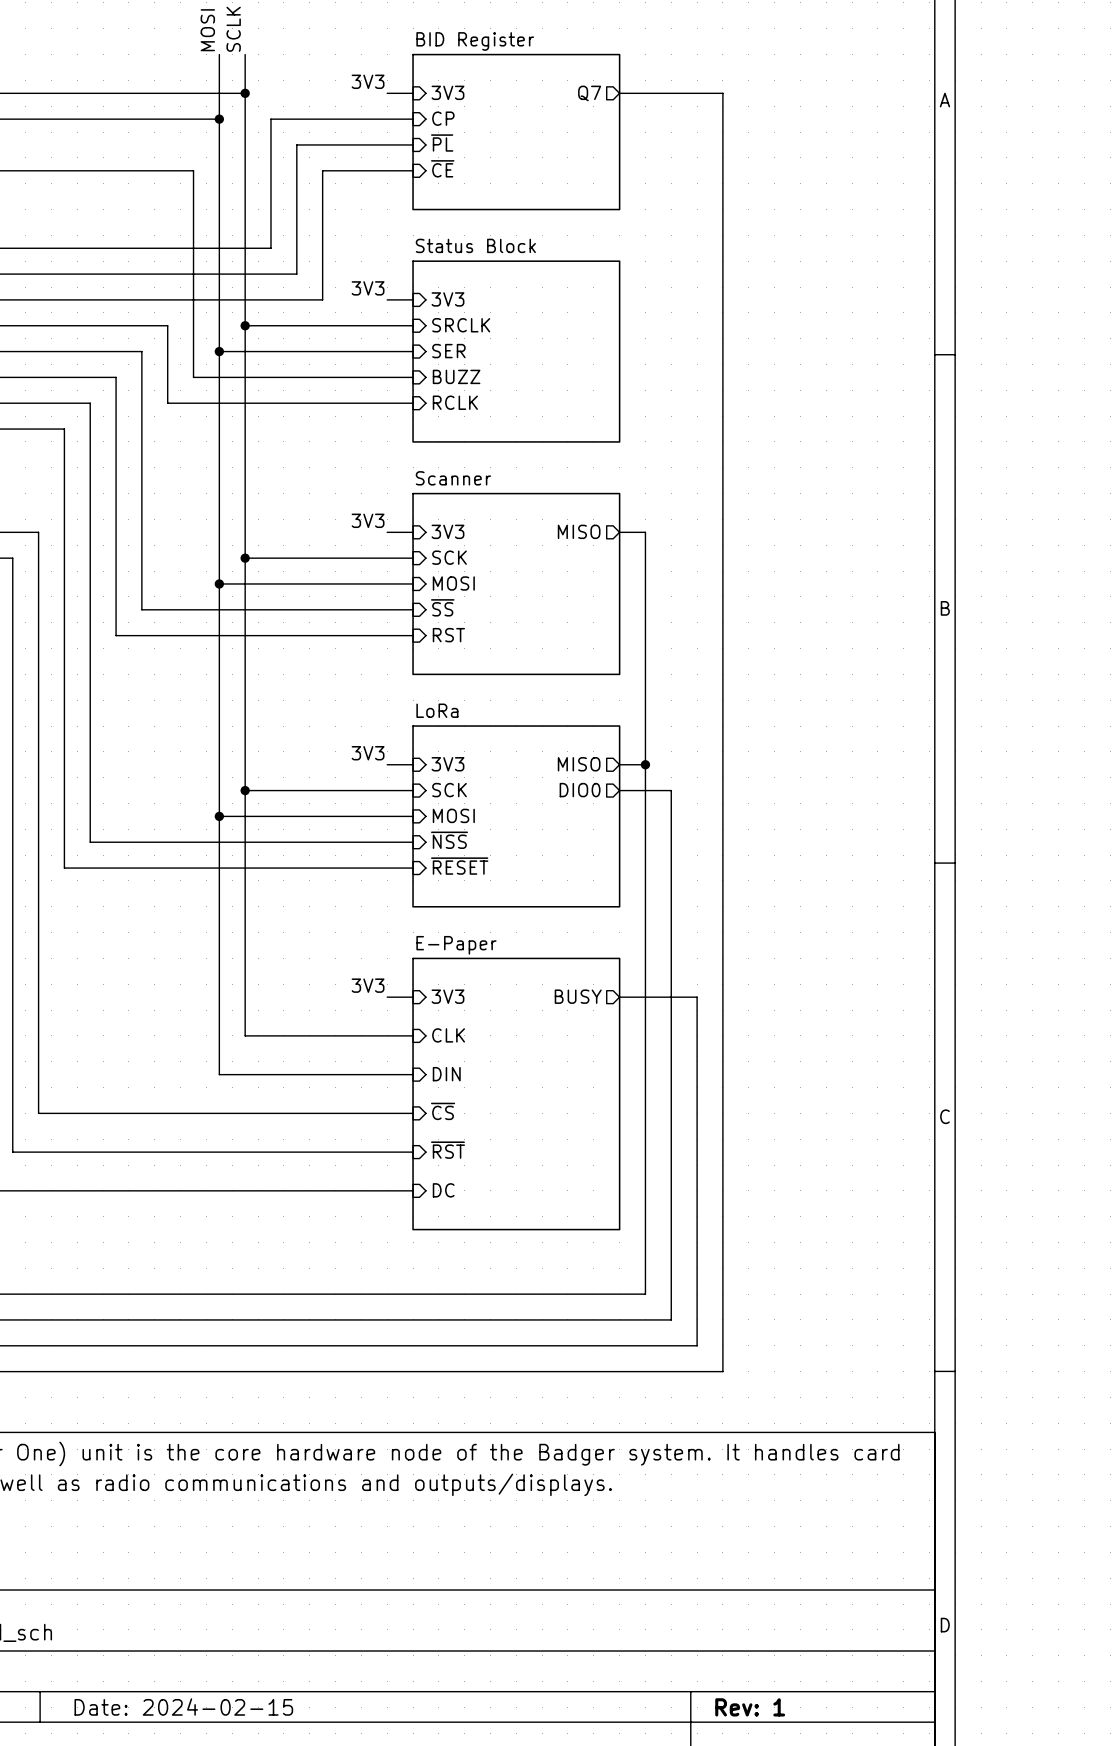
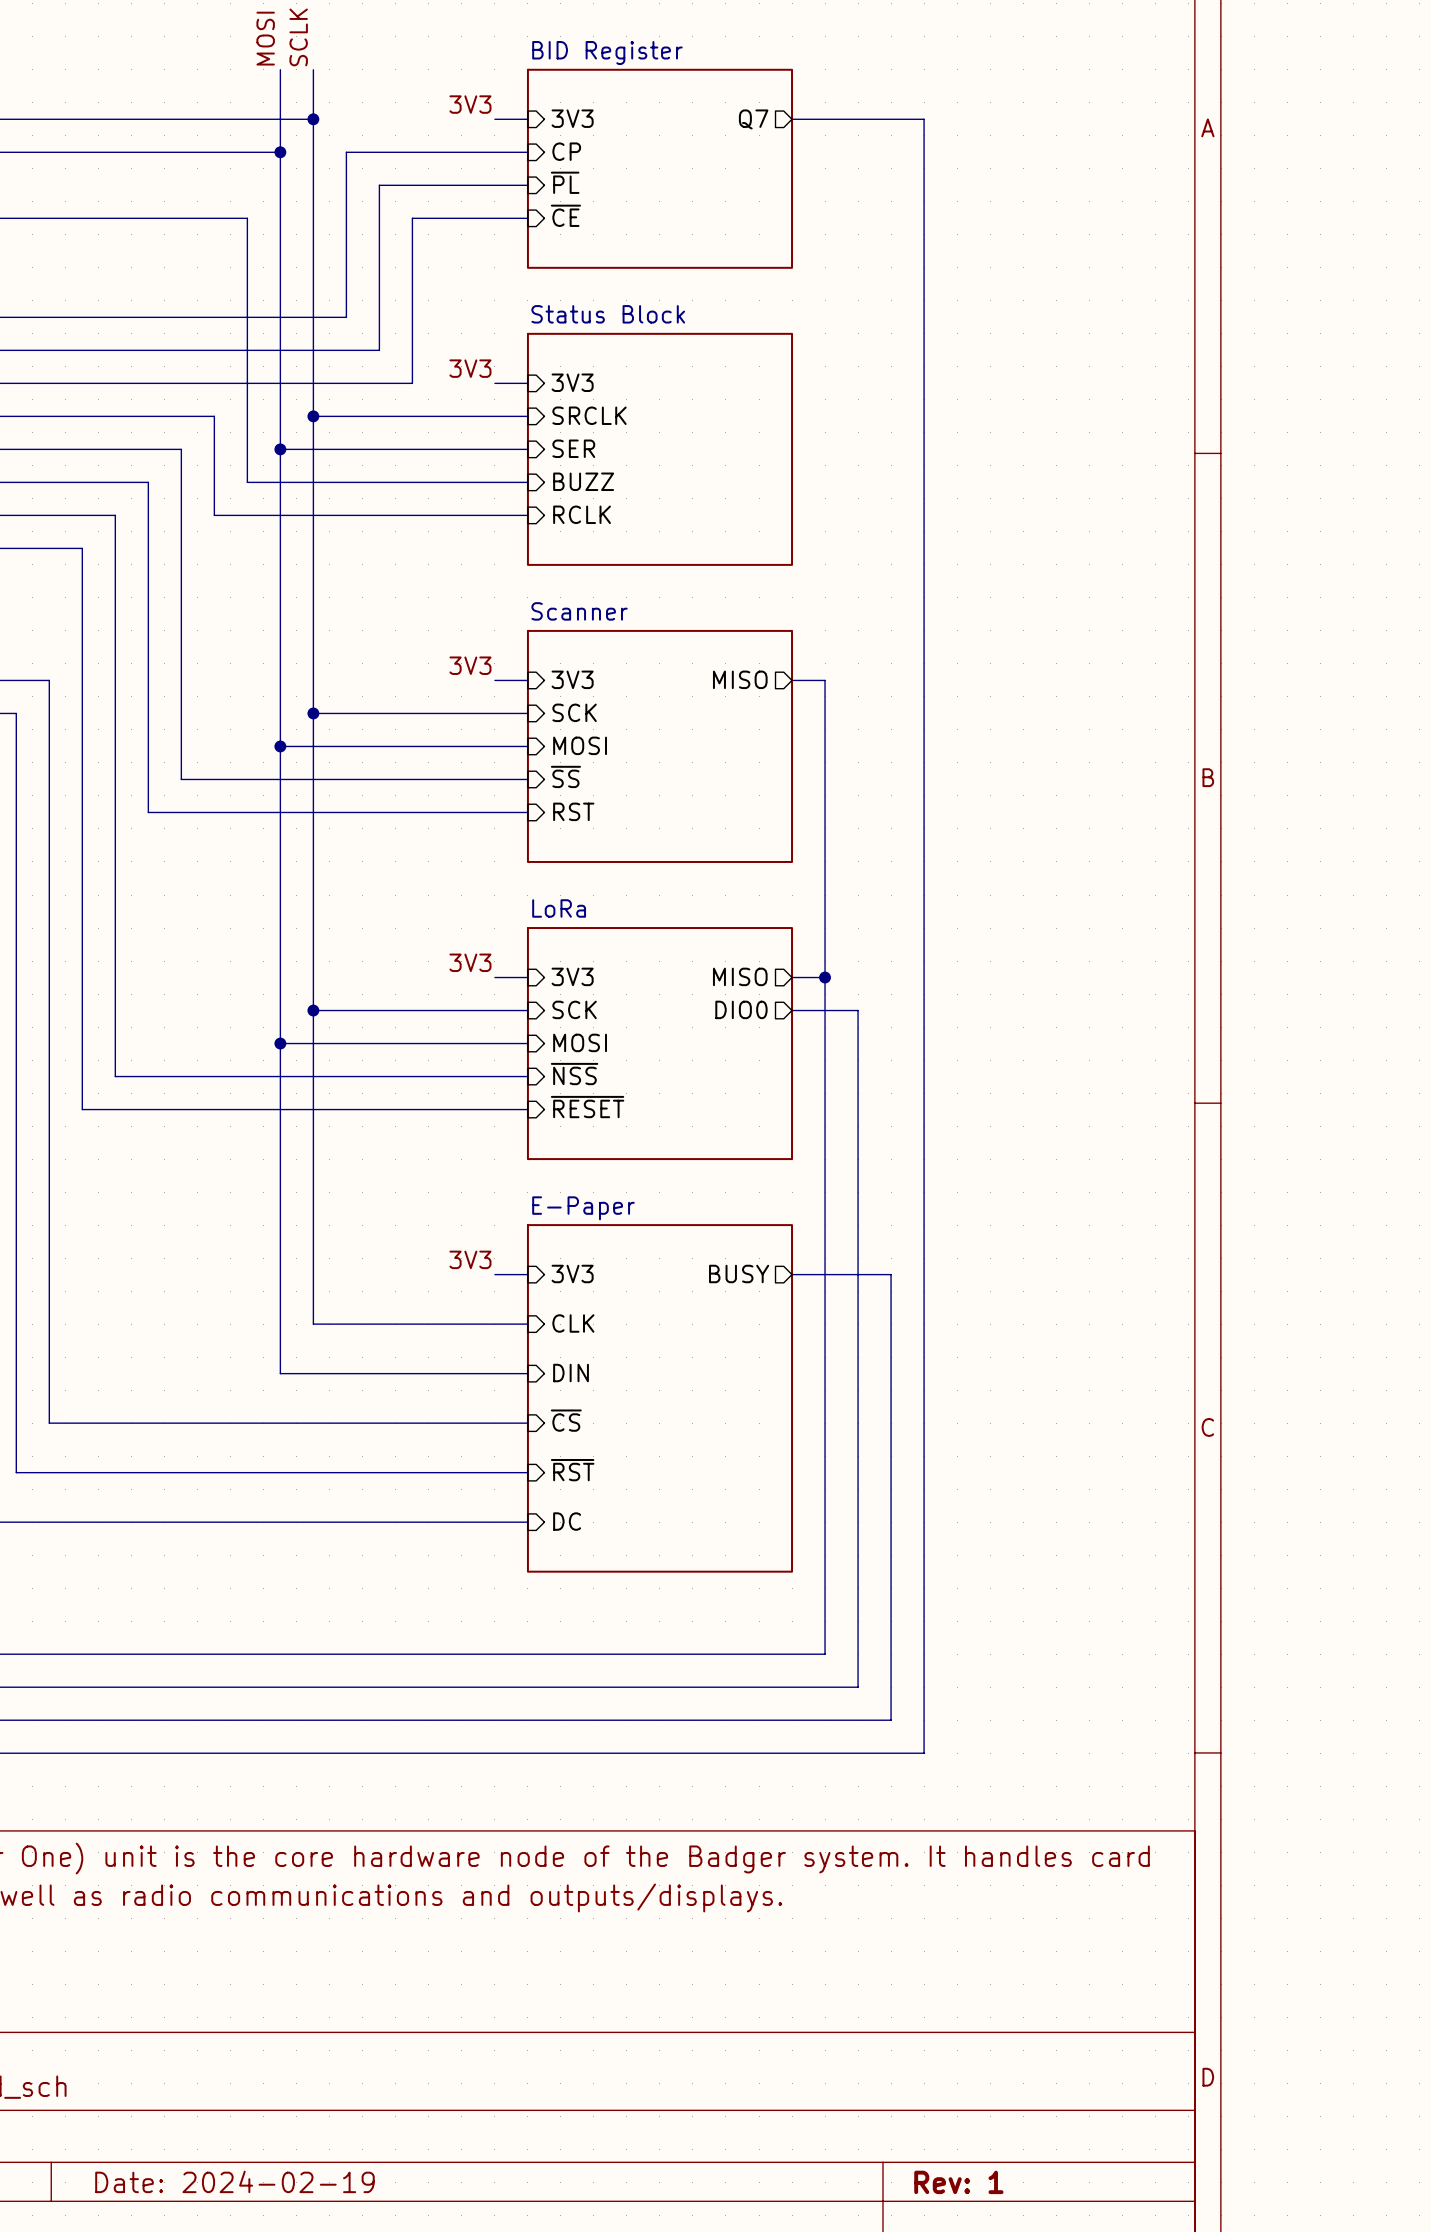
title block: Date: 2024-02-15 (183, 1707) -> Date: 2024-02-19 (234, 2181)

